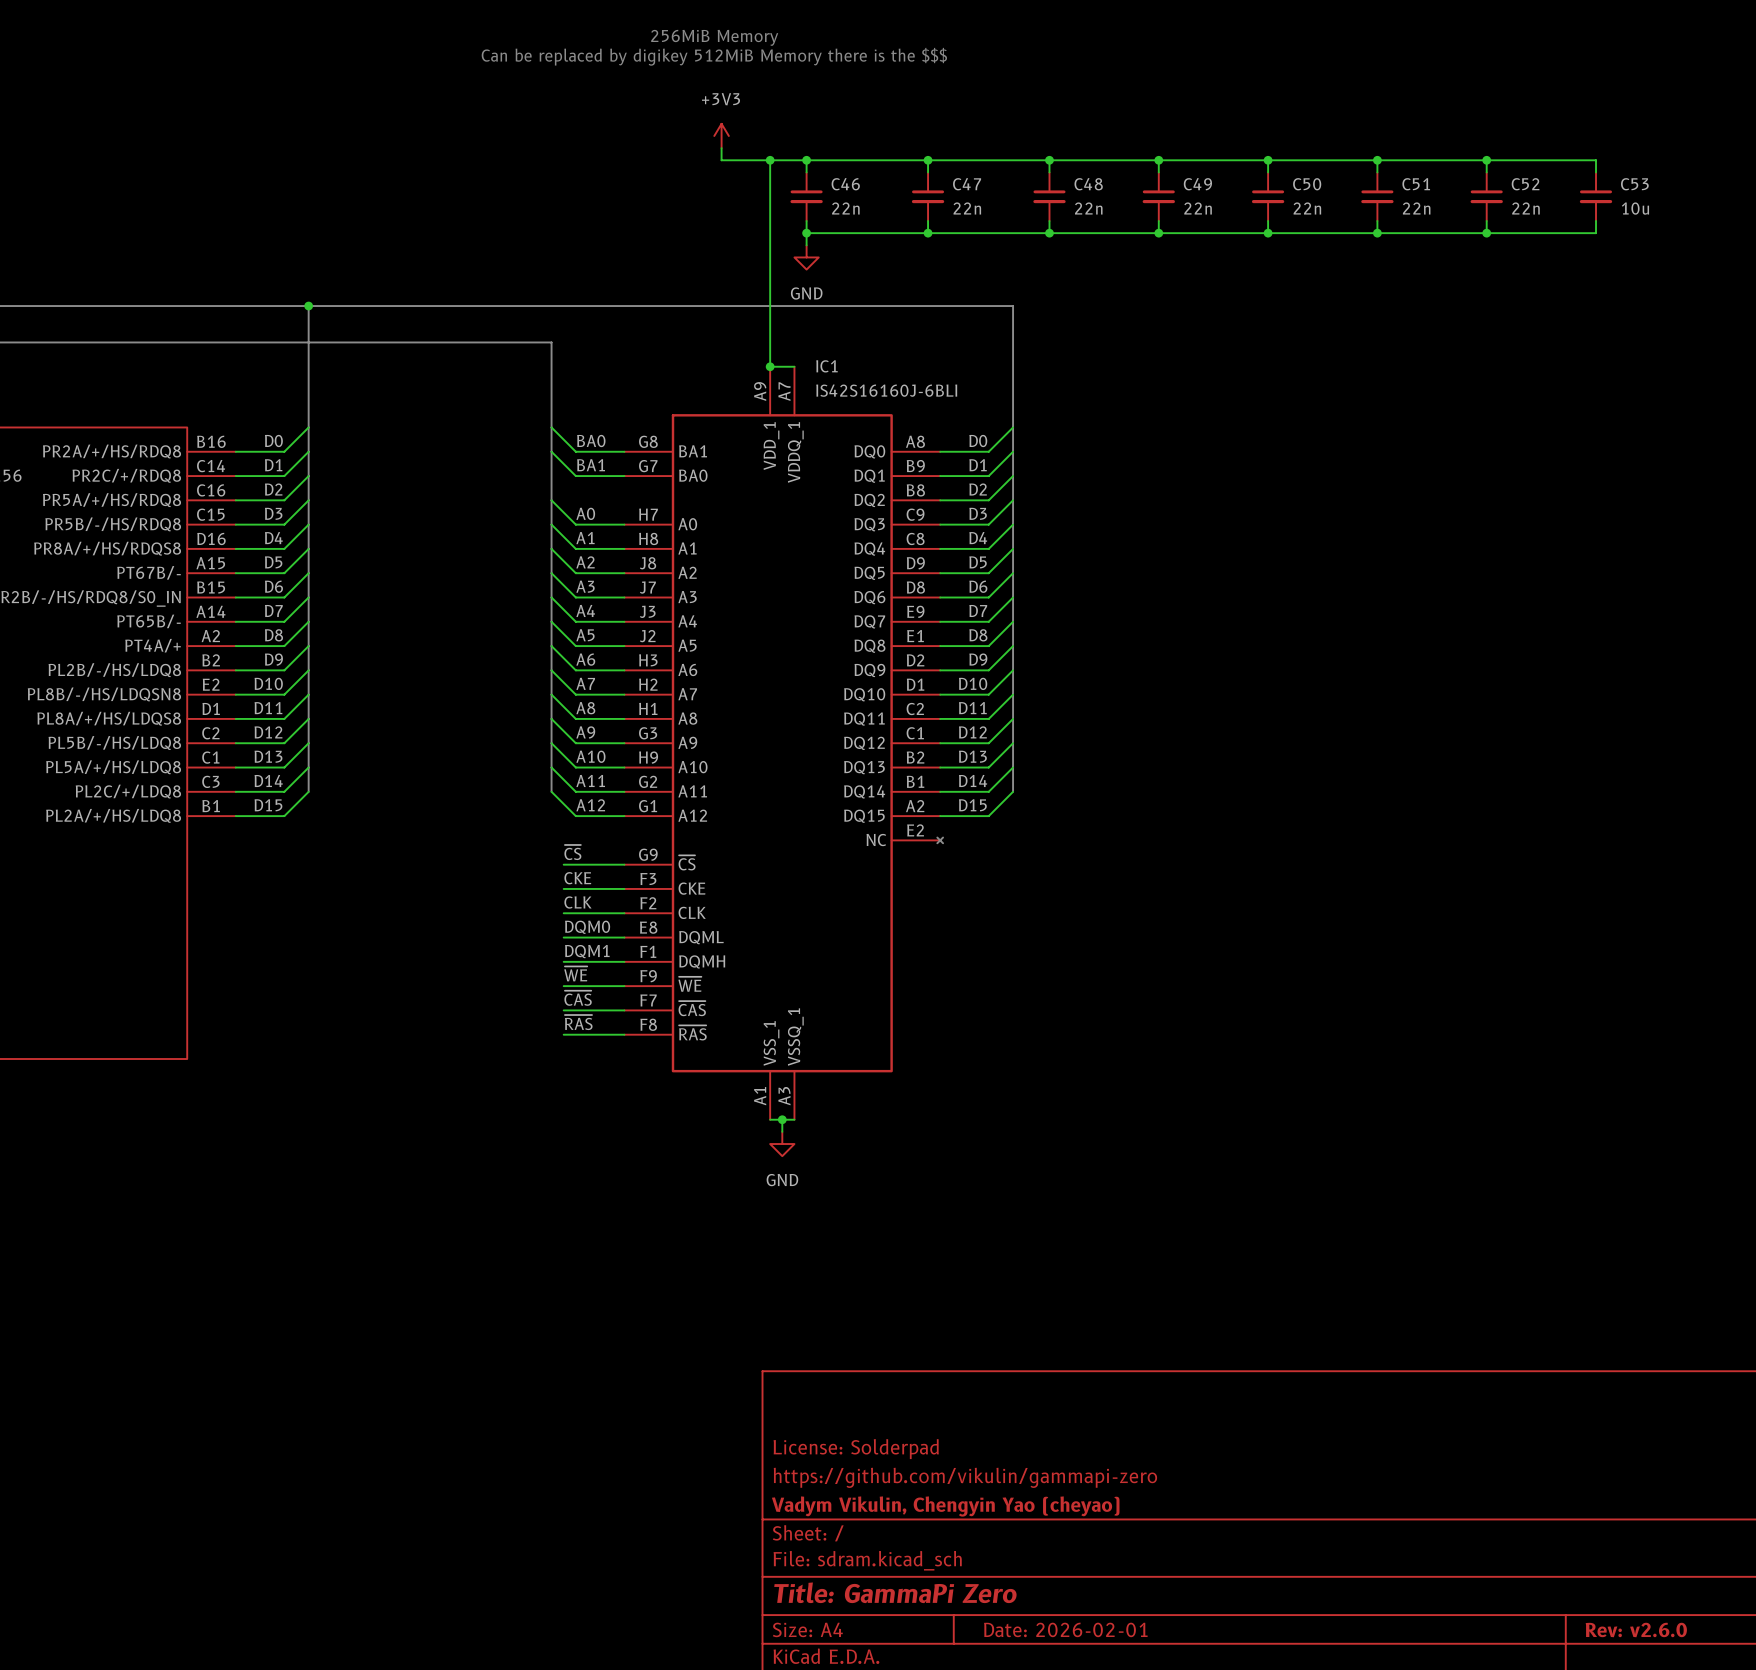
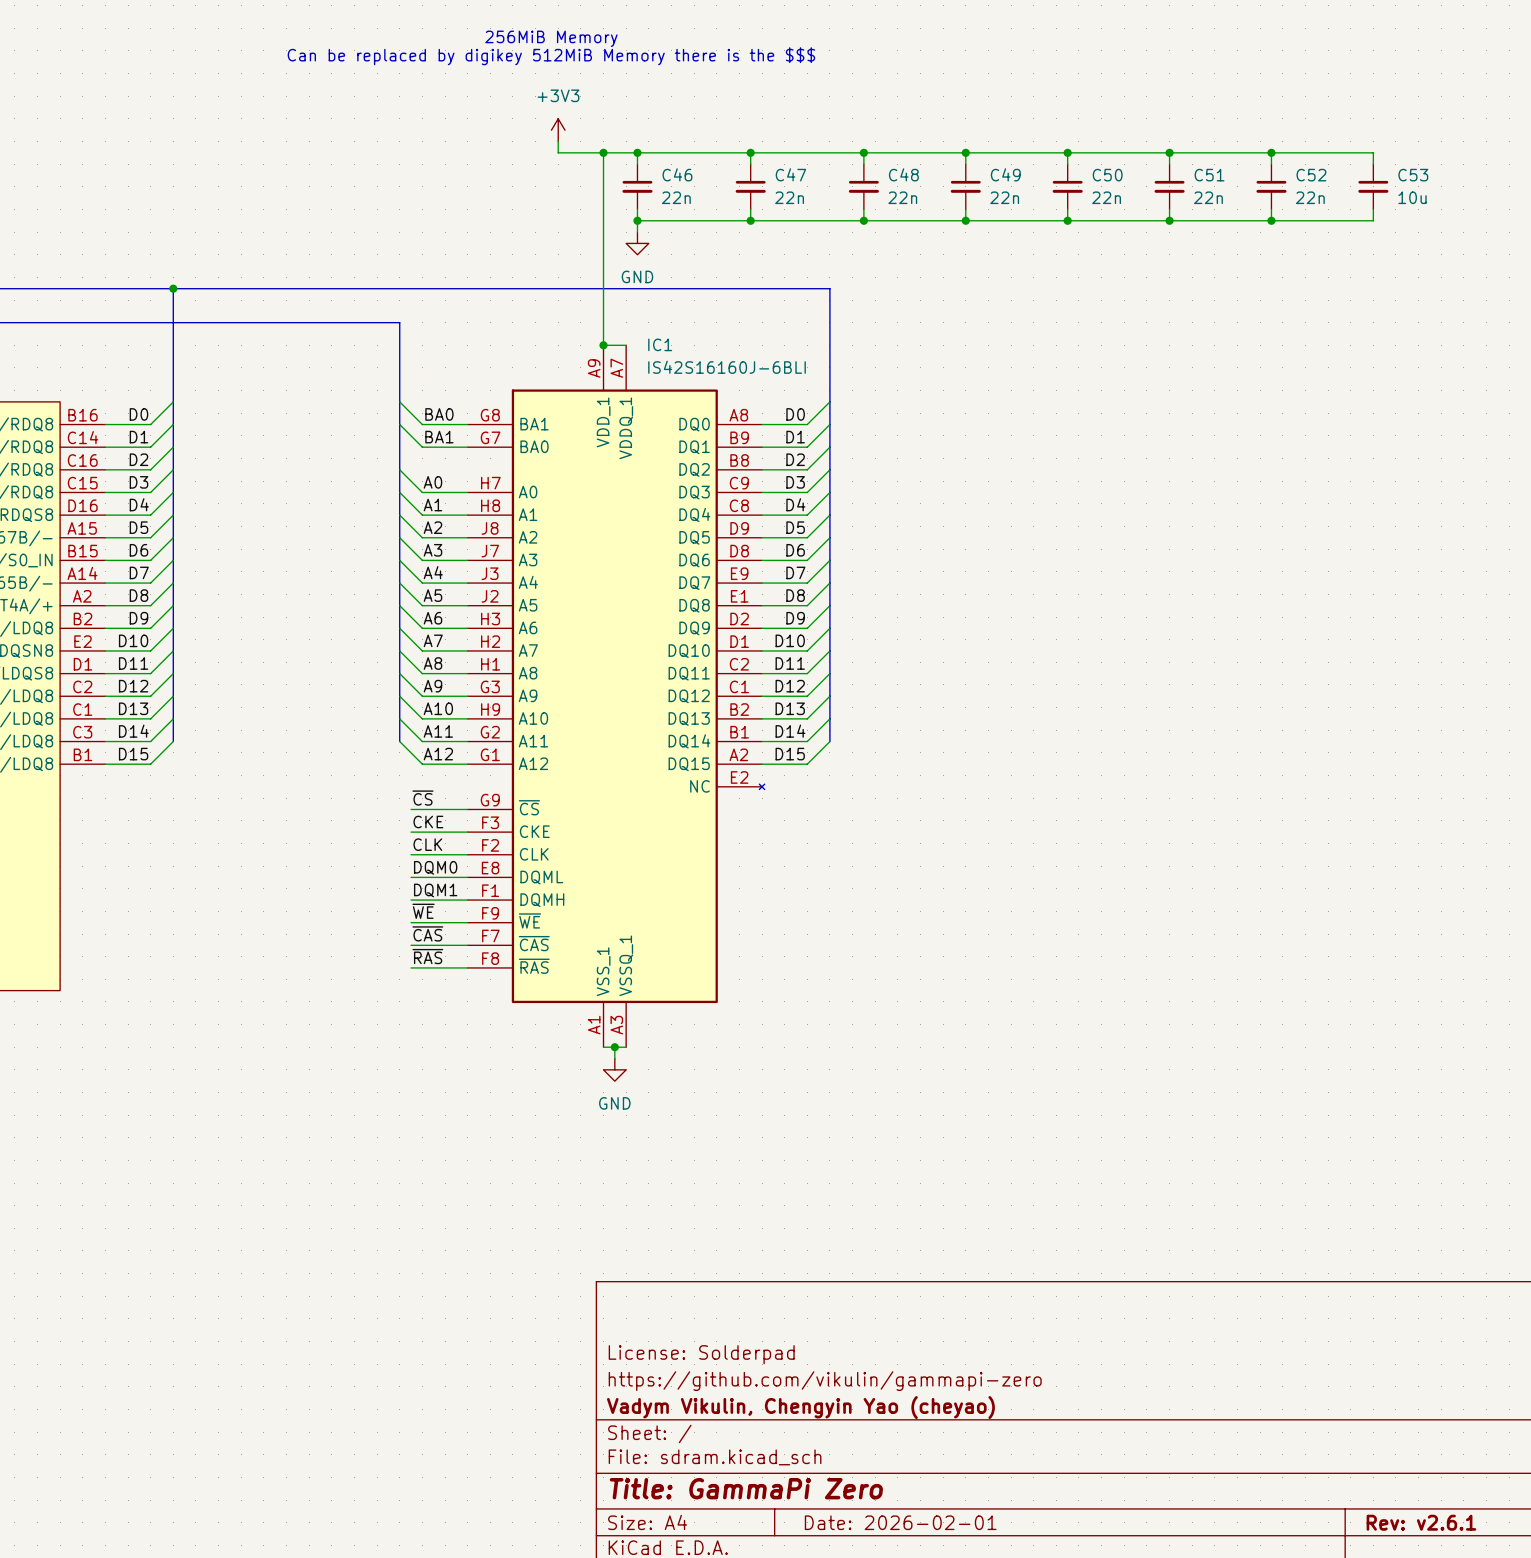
title block: Rev: v2.6.0 (1636, 1630) -> Rev: v2.6.1 (1421, 1522)

